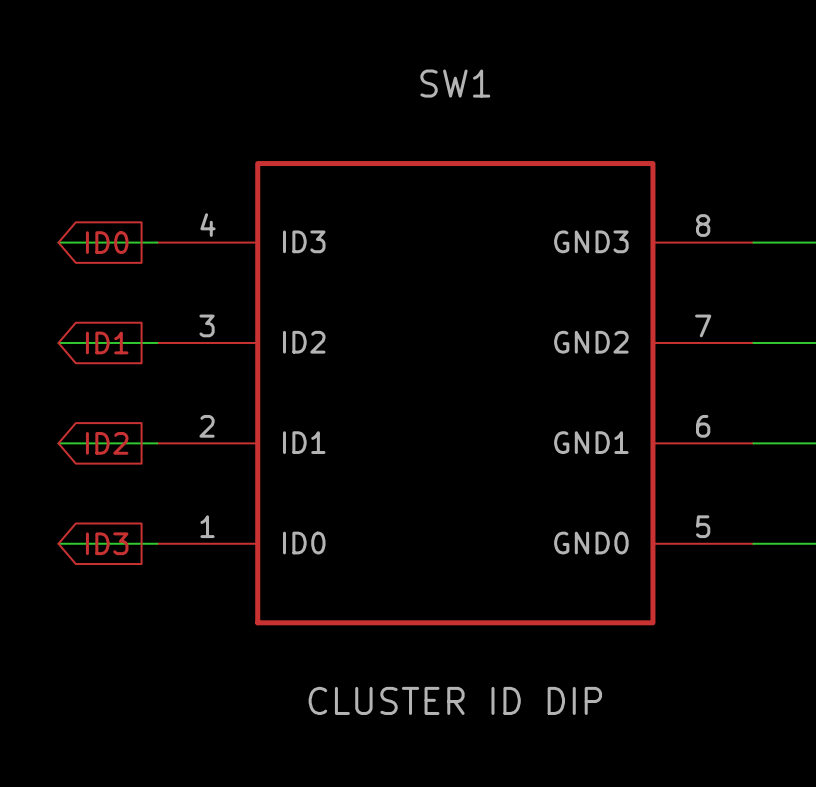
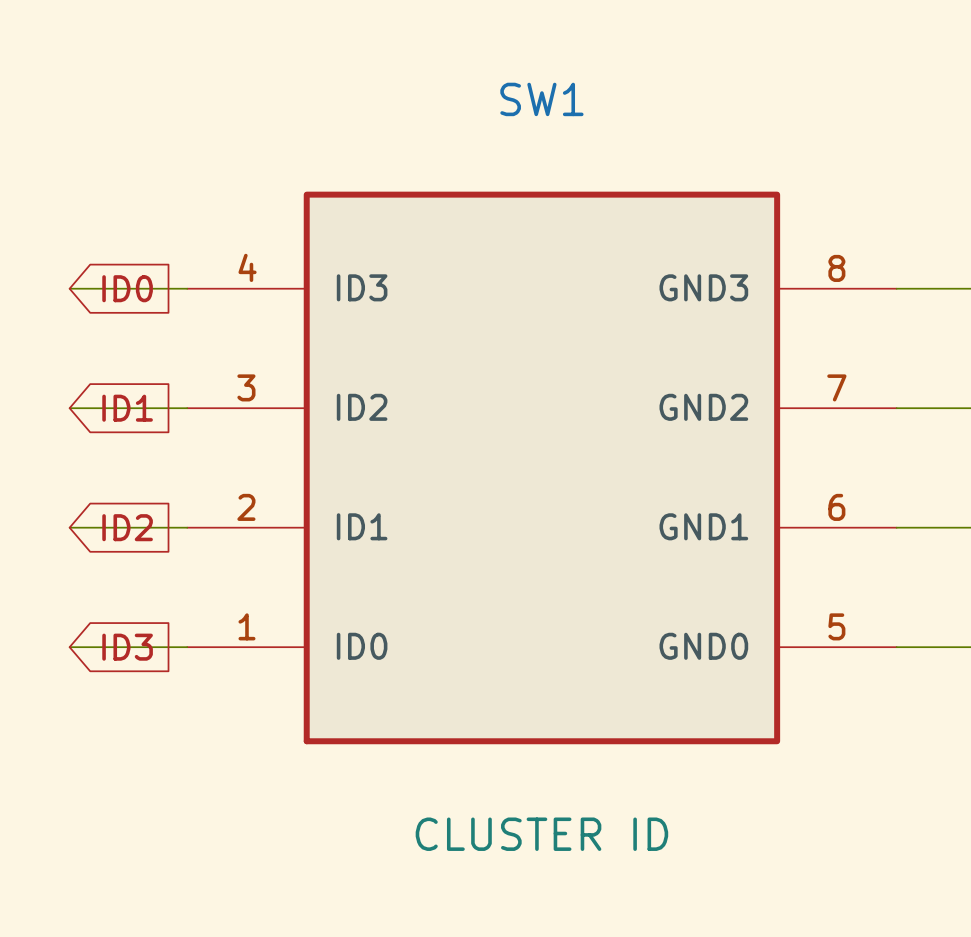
SW1 value: CLUSTER ID DIP (455, 700) -> CLUSTER ID (541, 834)

